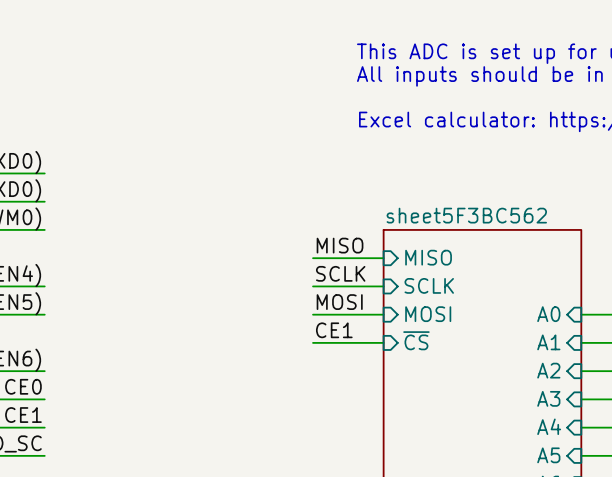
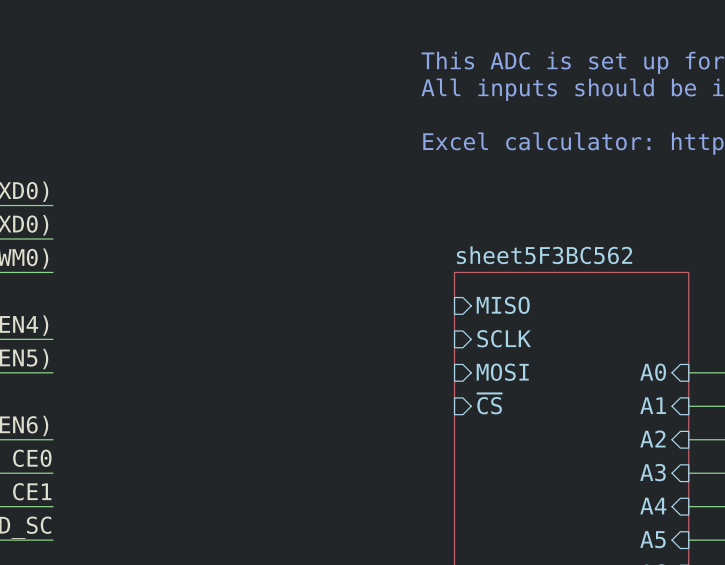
label: MISO (340, 245) -> none
wire: (313, 258) (383, 258) -> none
label: SCLK (340, 273) -> none
wire: (313, 286) (383, 286) -> none
label: MOSI (339, 302) -> none
wire: (313, 314) (383, 314) -> none
label: CE1 (334, 330) -> none
wire: (313, 342) (383, 342) -> none

